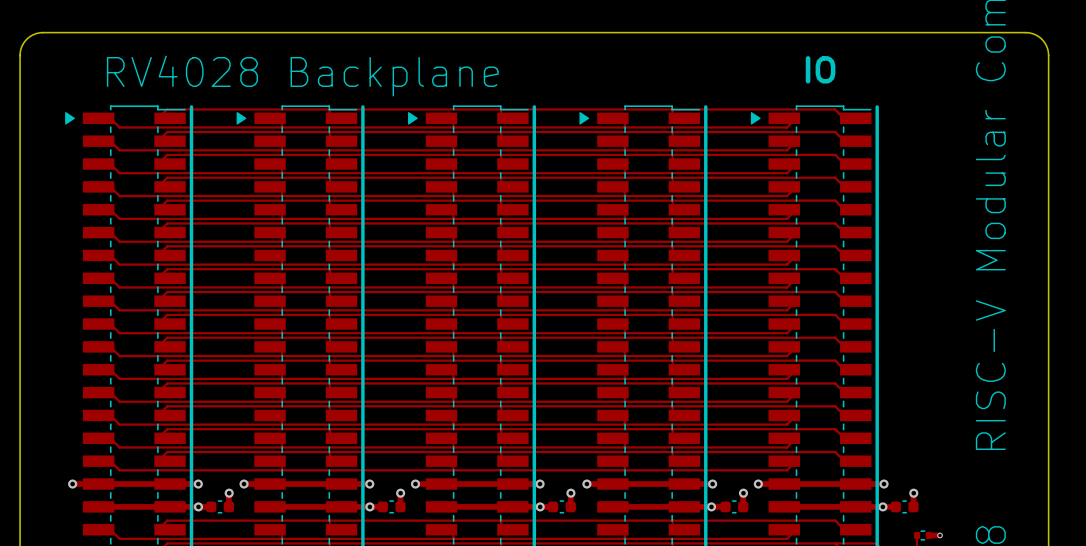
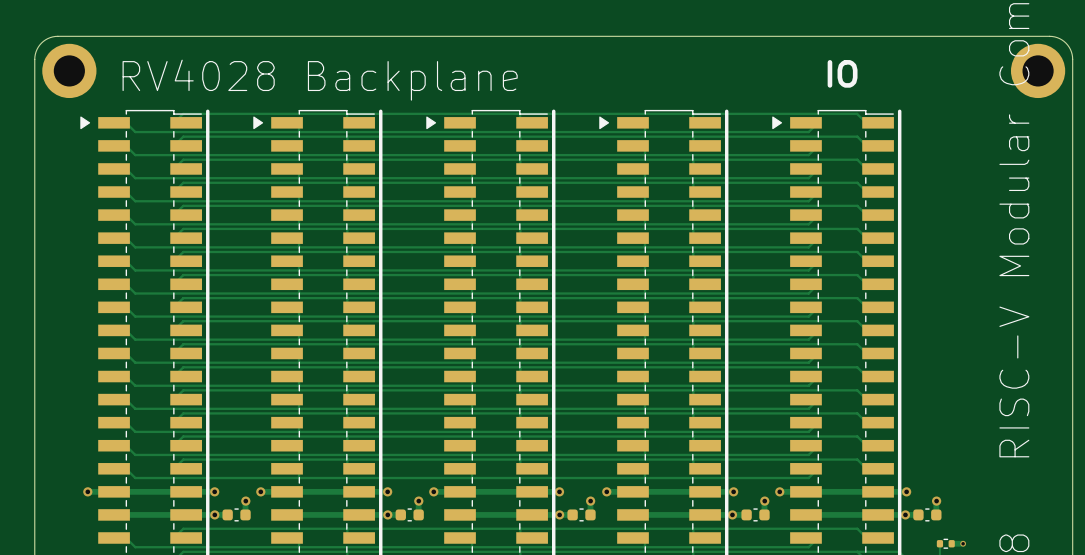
part: none -> (69, 70)
part: none -> (1038, 70)

